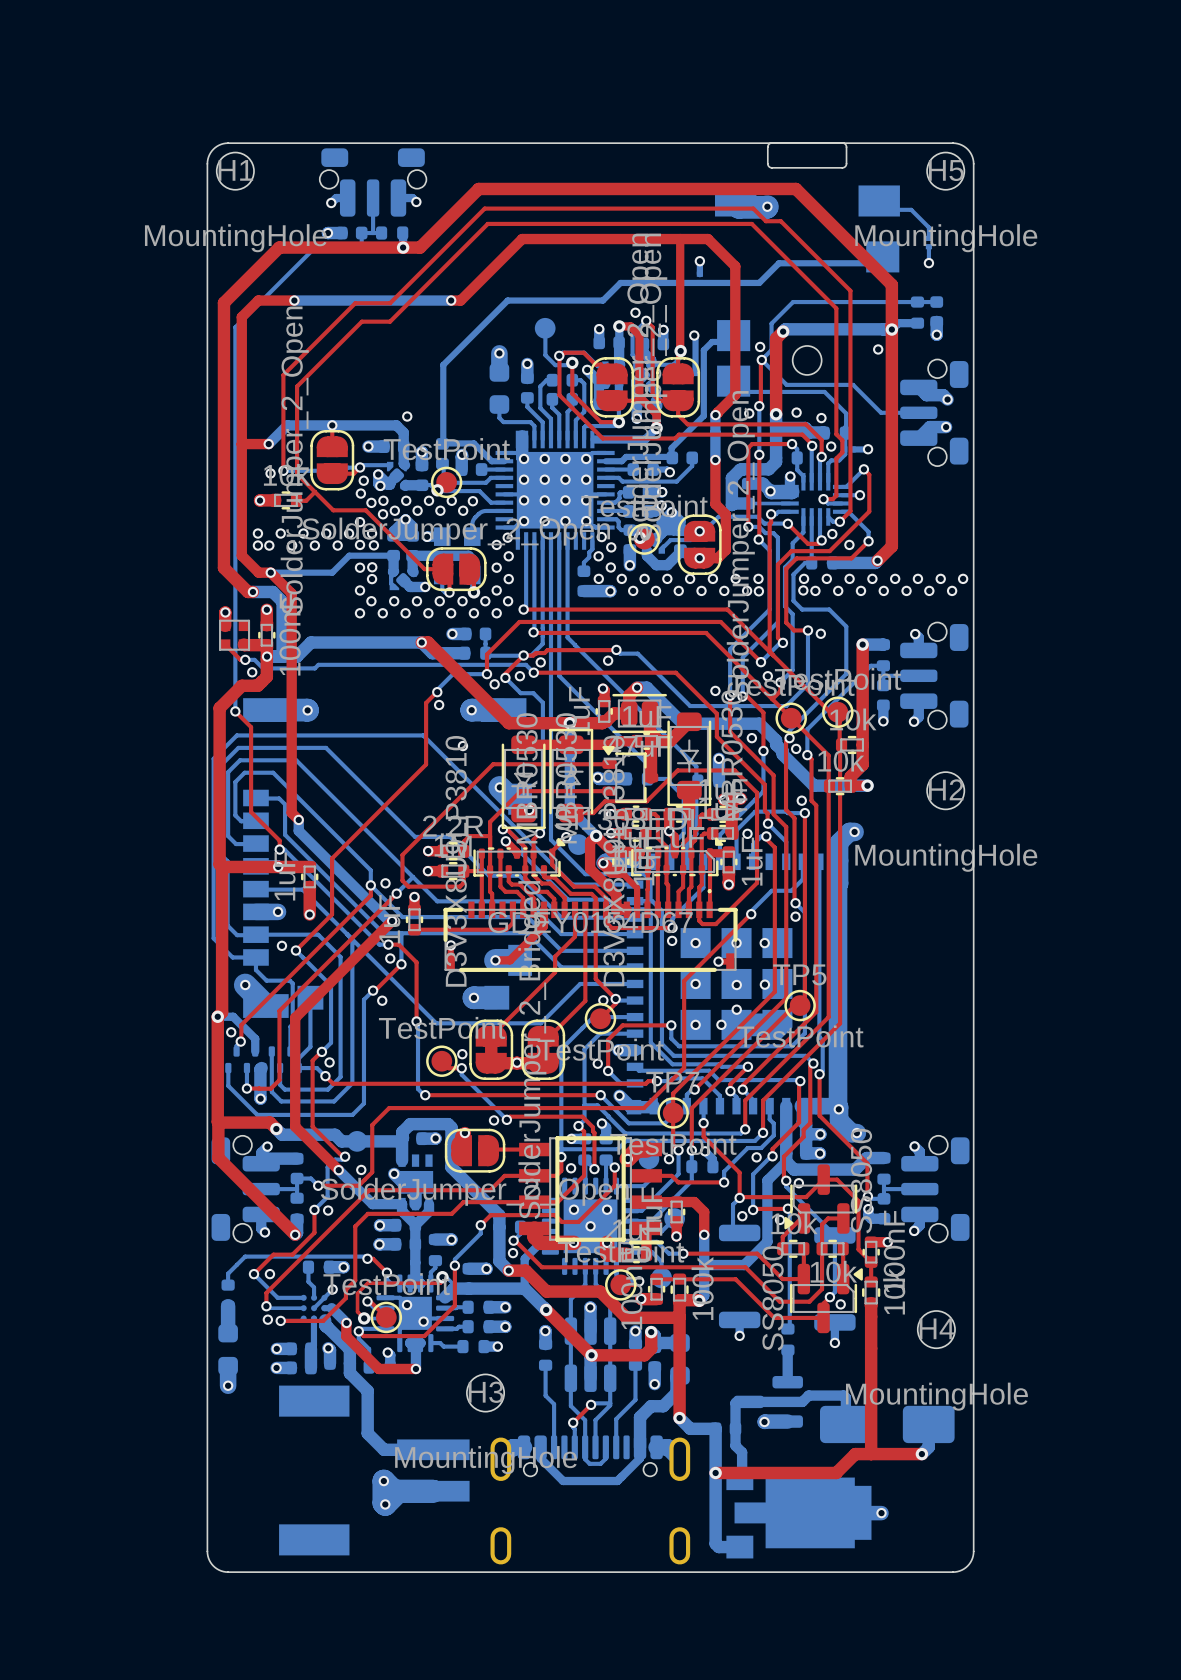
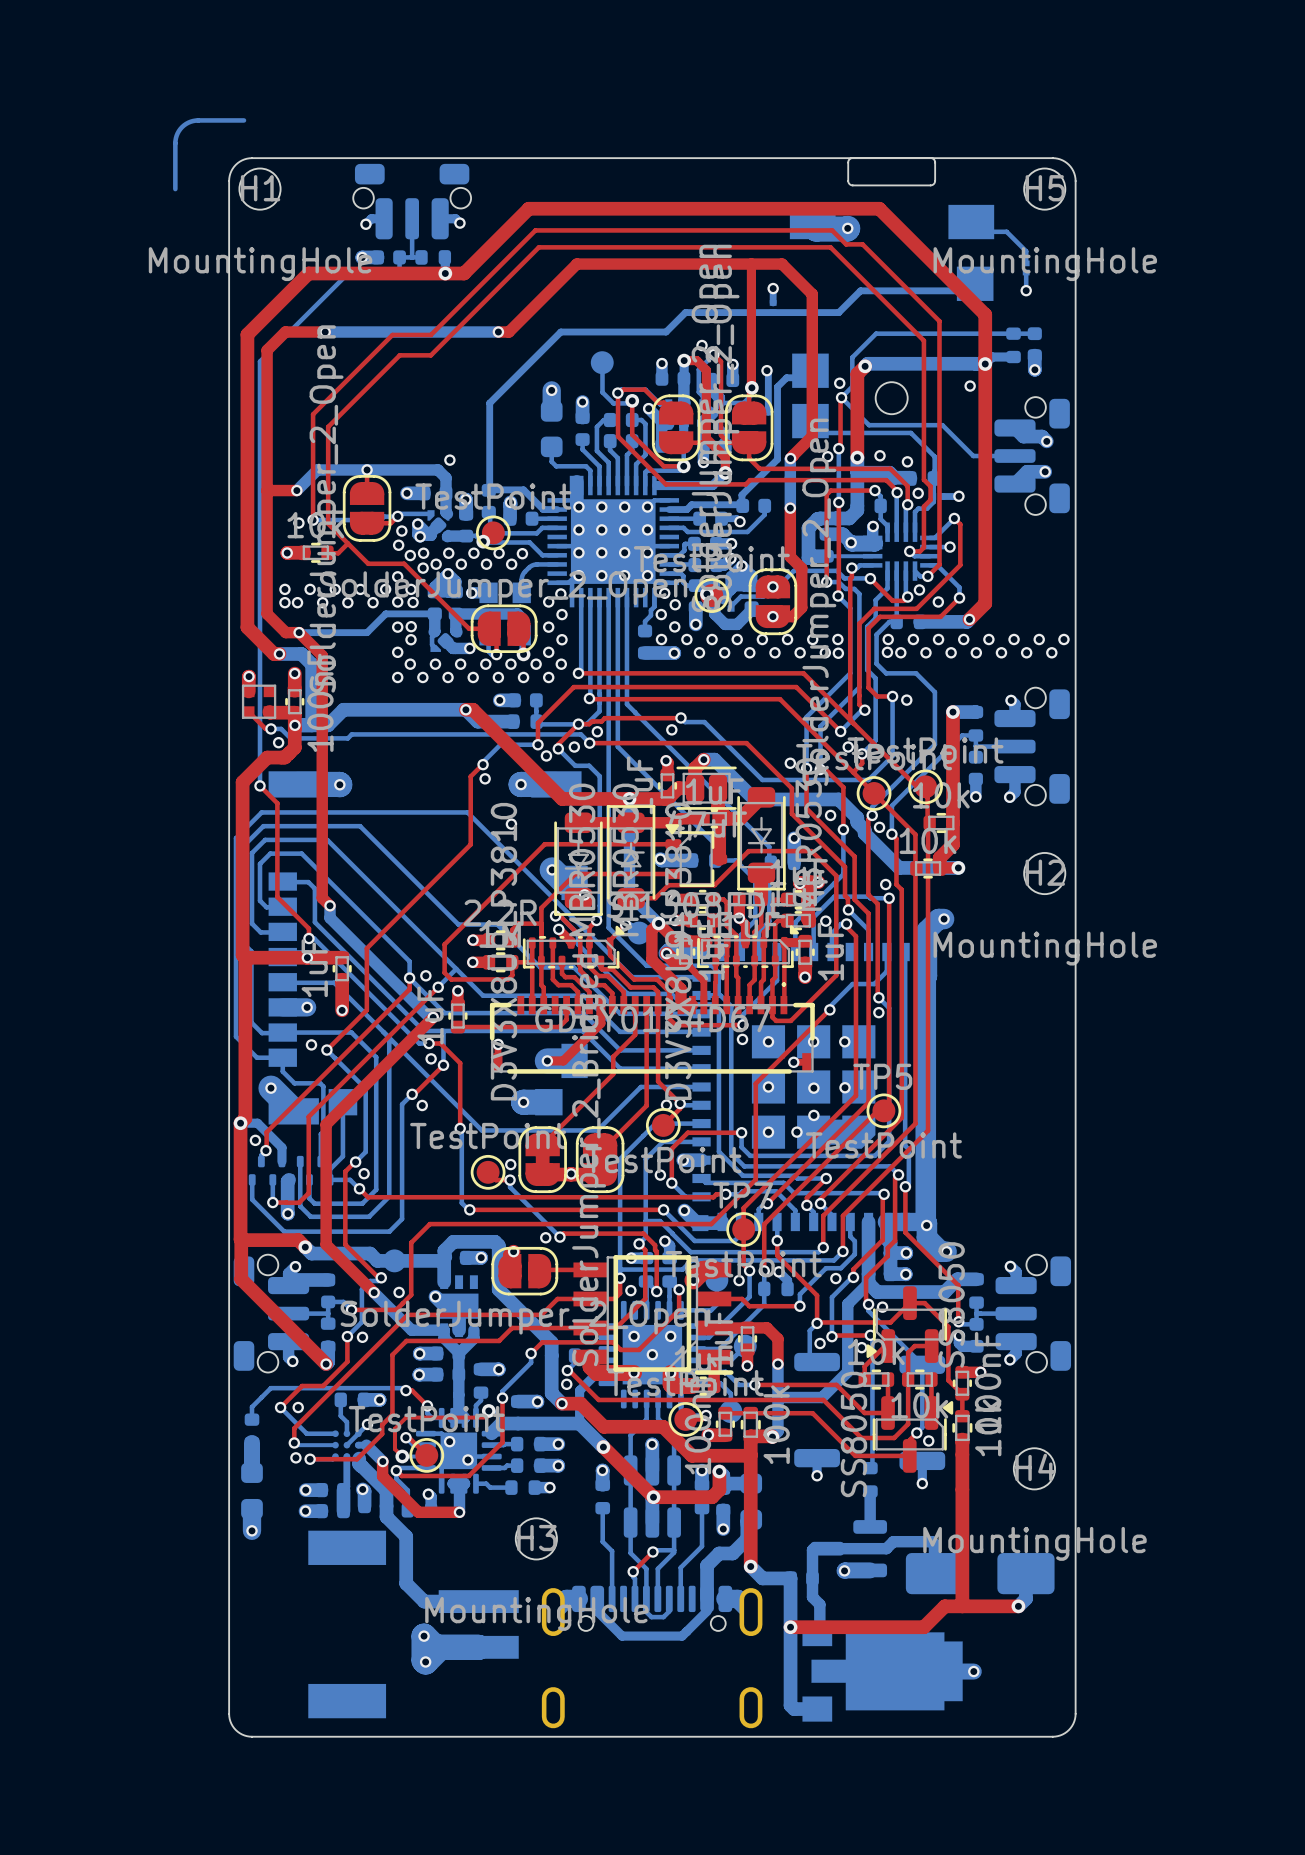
bottom track: none -> (243, 120) (195, 120) (182, 127) (175, 140) (175, 189)

